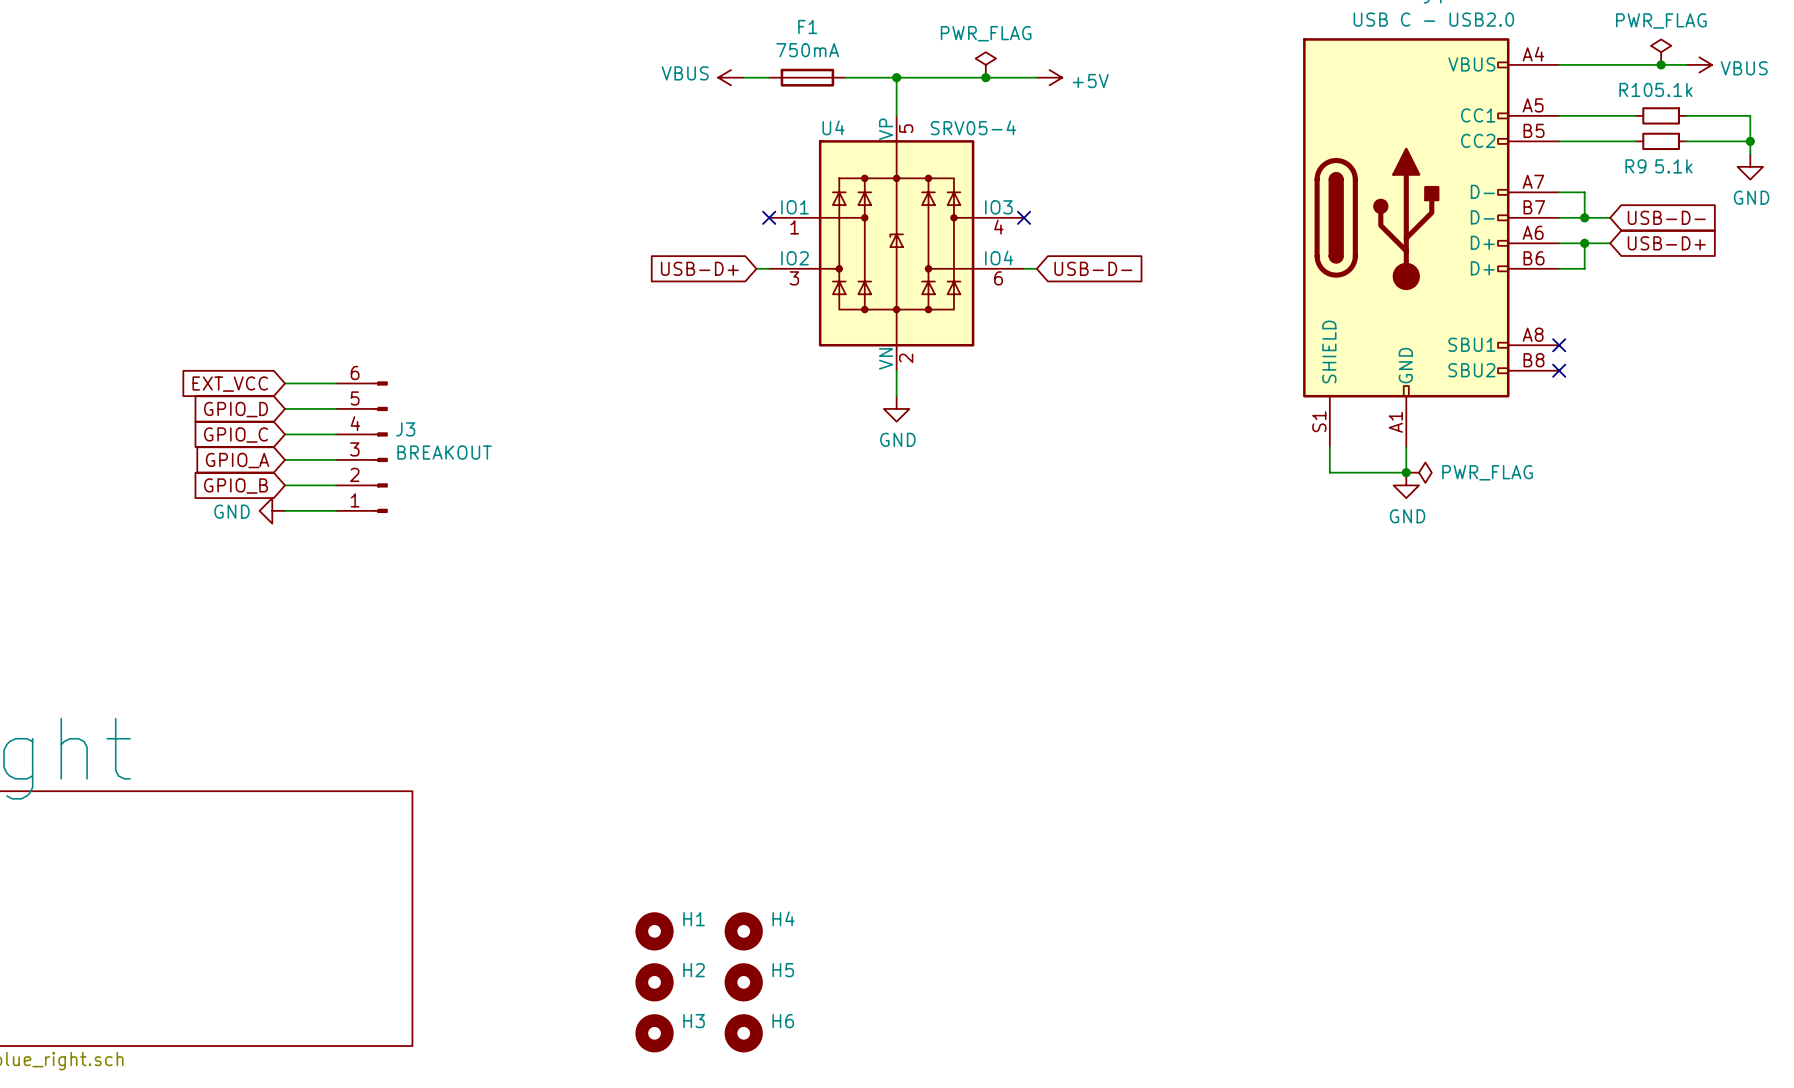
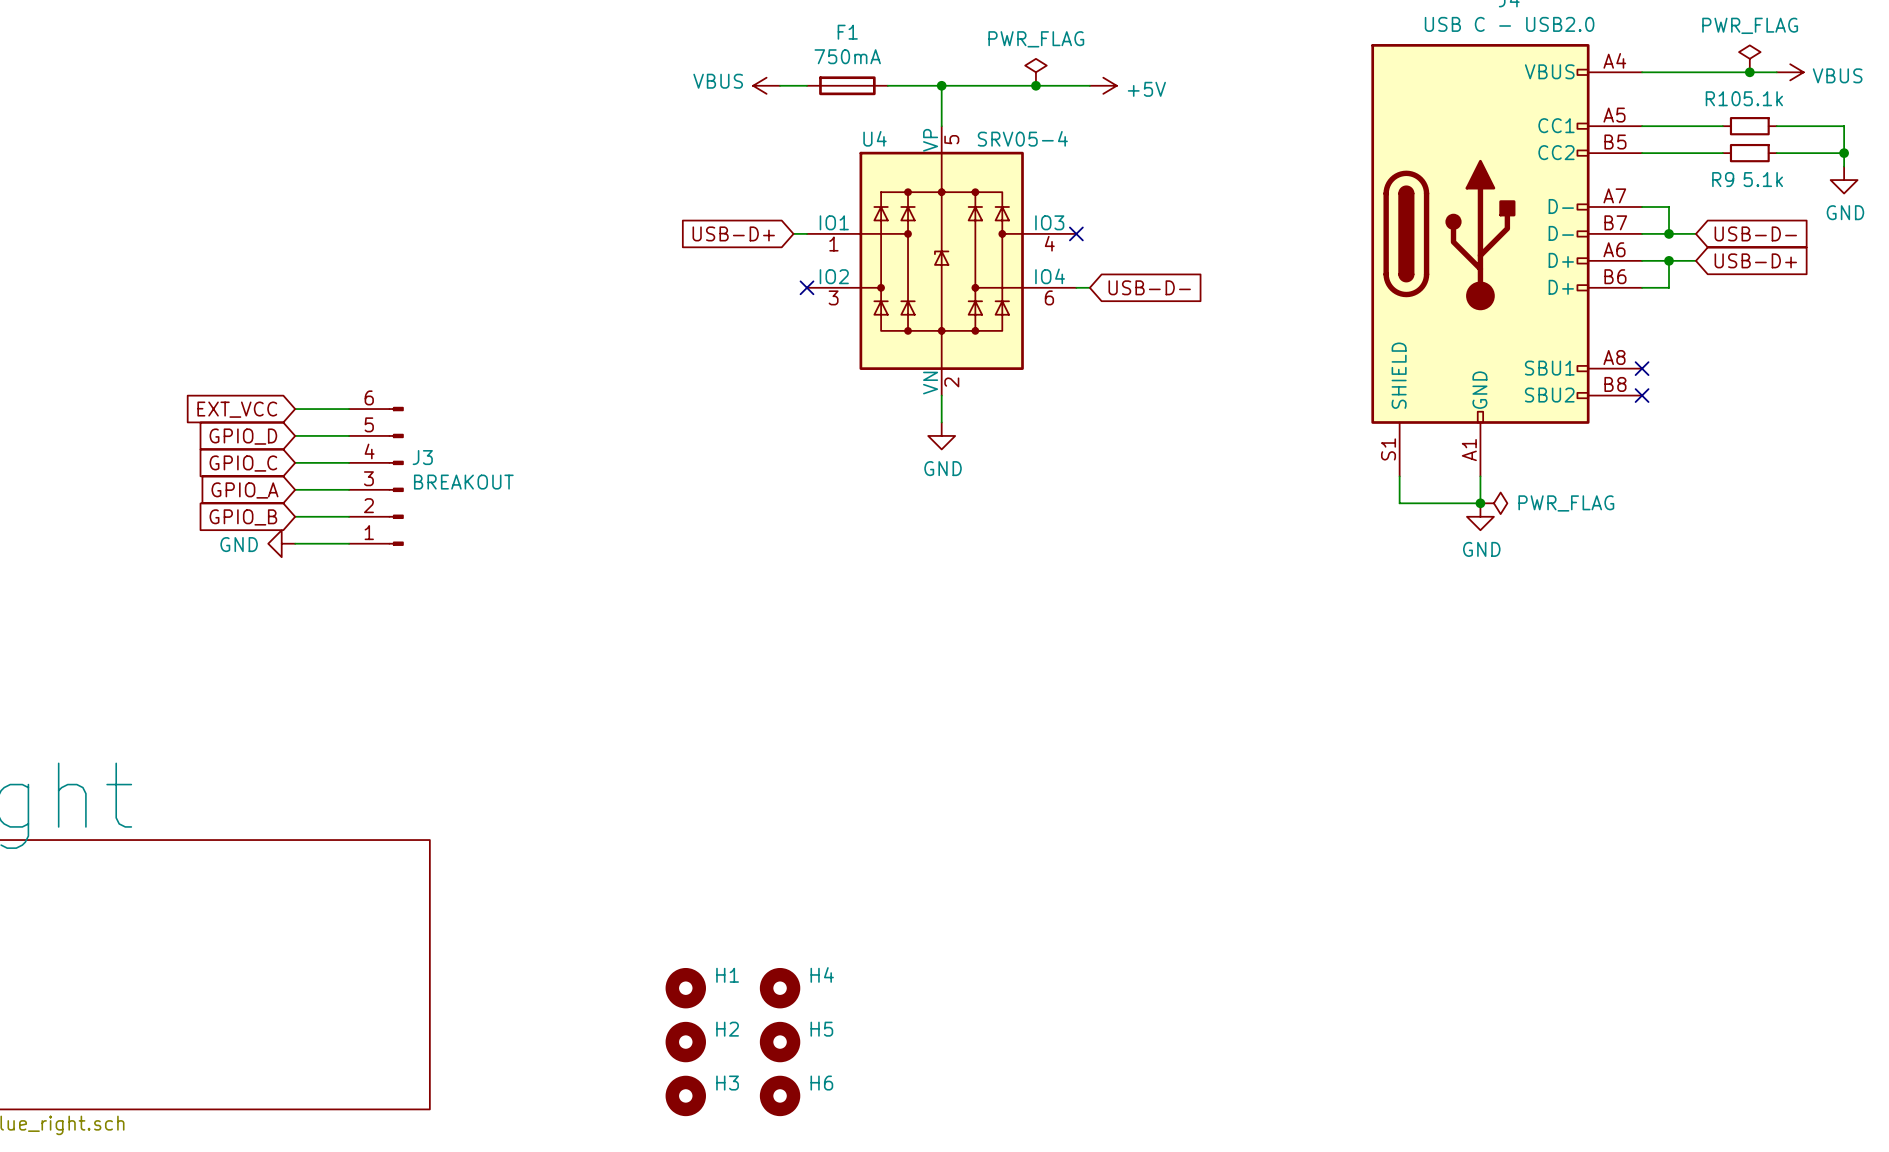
no-connect mark position: (769, 217) -> (807, 287)
global label position: USB-D+ (699, 268) -> USB-D+ (733, 233)
wire: (756, 268) (769, 268) -> (793, 233) (807, 233)

